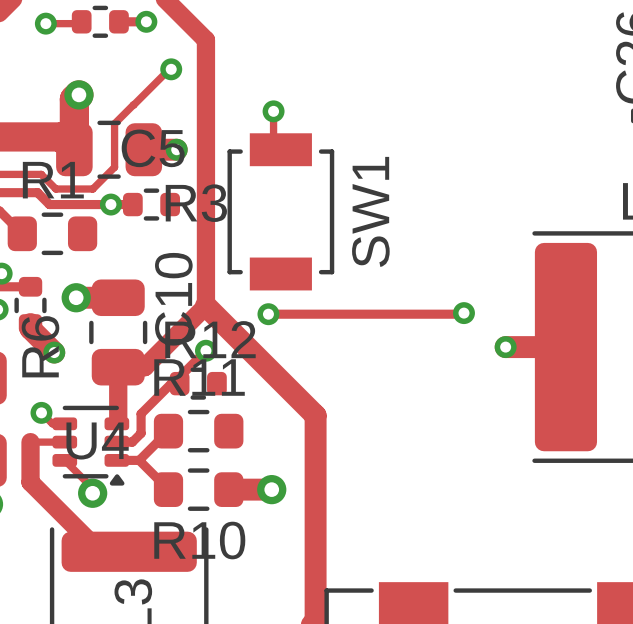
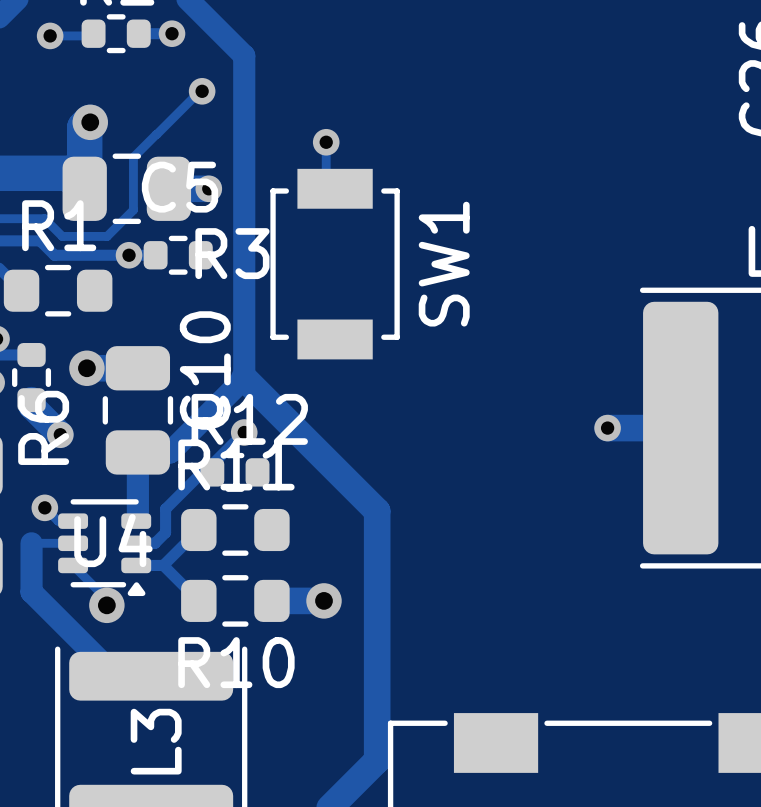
track: (463, 313) (268, 314) -> none
via: (463, 313) -> none
via: (268, 314) -> none

